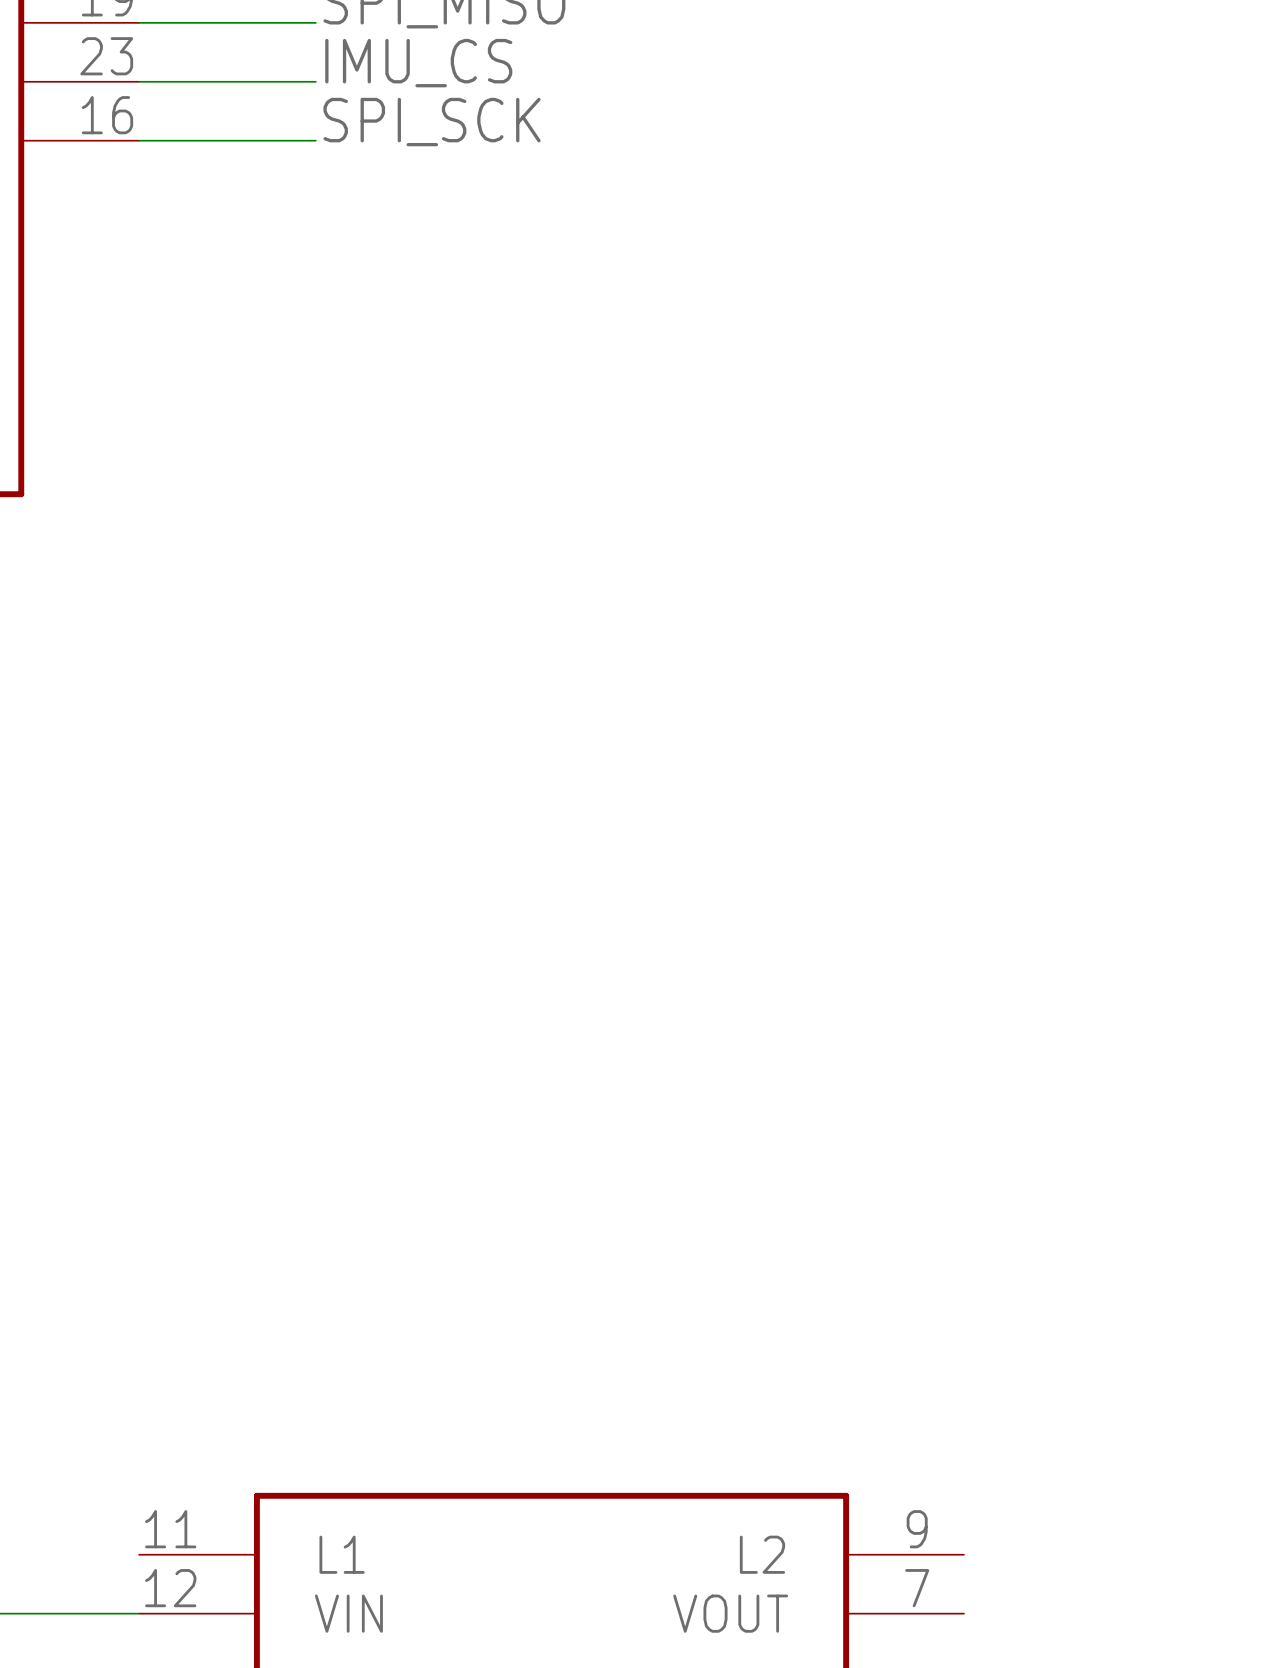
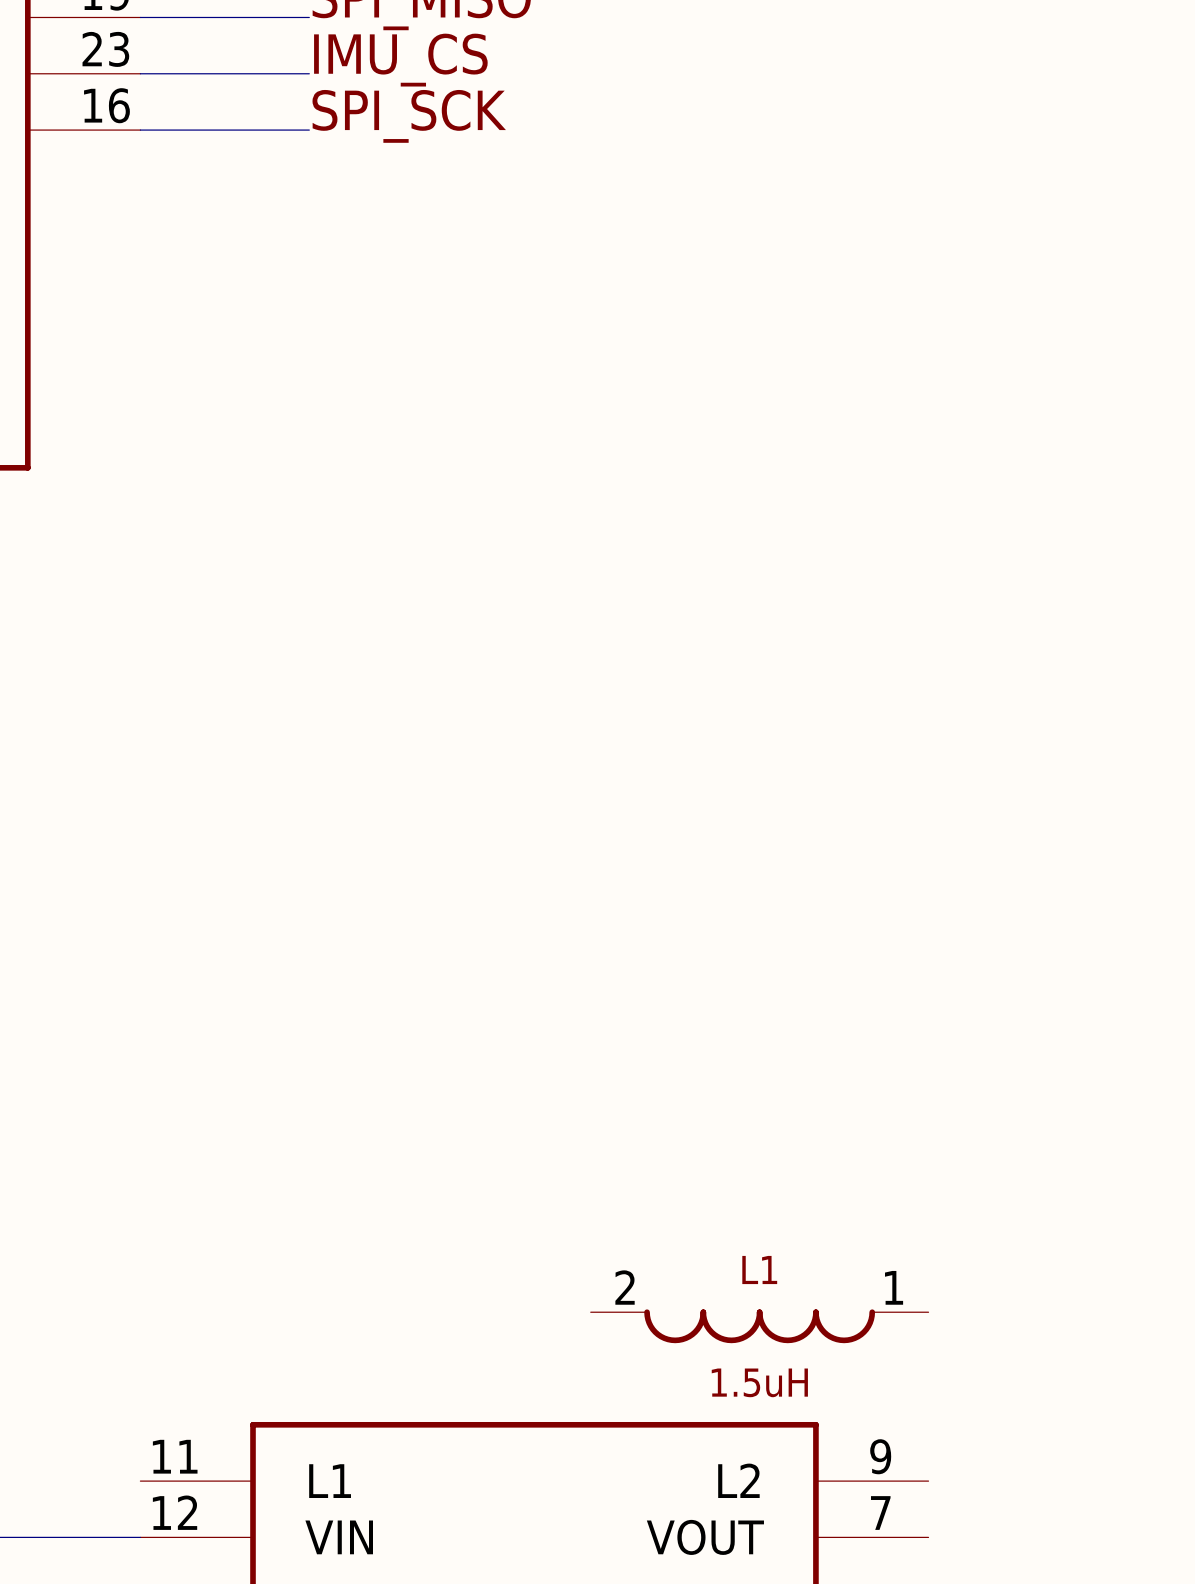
L1: none -> 1.5uH (759, 1326)

